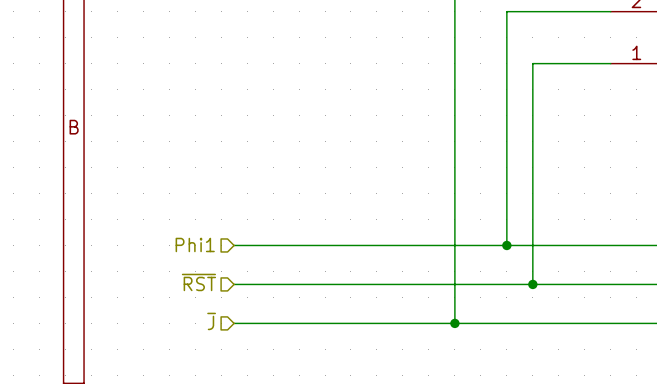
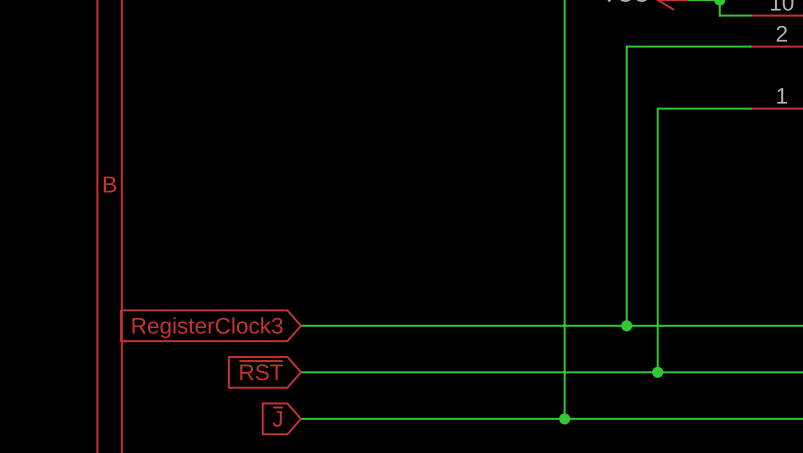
hierarchical label: Phi1 (195, 244) -> none
global label: none -> RegisterClock3 (207, 327)
hierarchical label: ~{RST} (198, 282) -> none
global label: none -> ~{RST} (261, 370)
hierarchical label: ~{J} (211, 321) -> none
global label: none -> ~{J} (277, 417)

